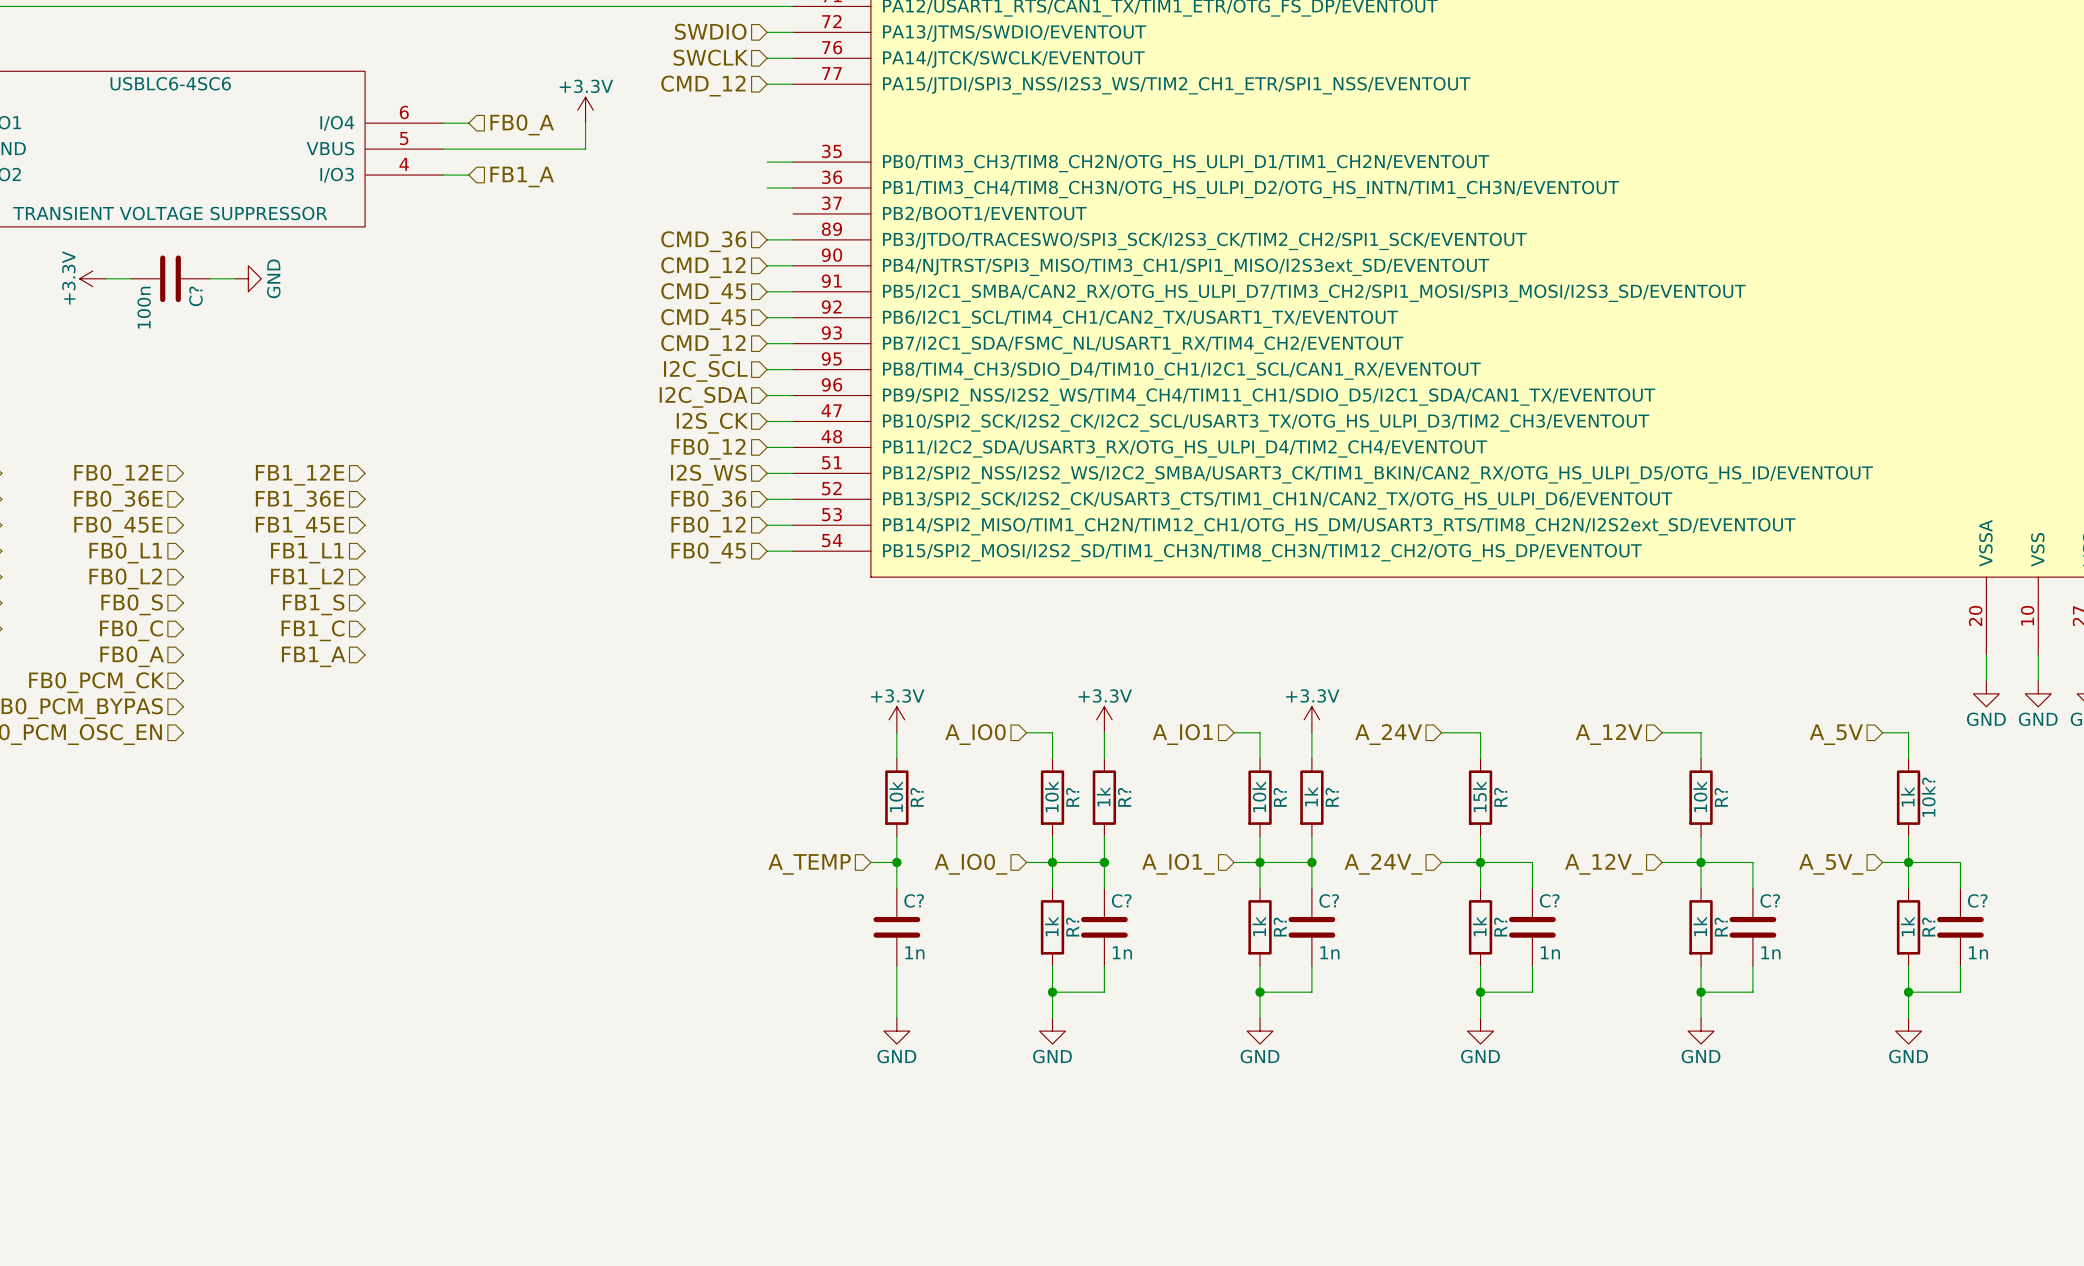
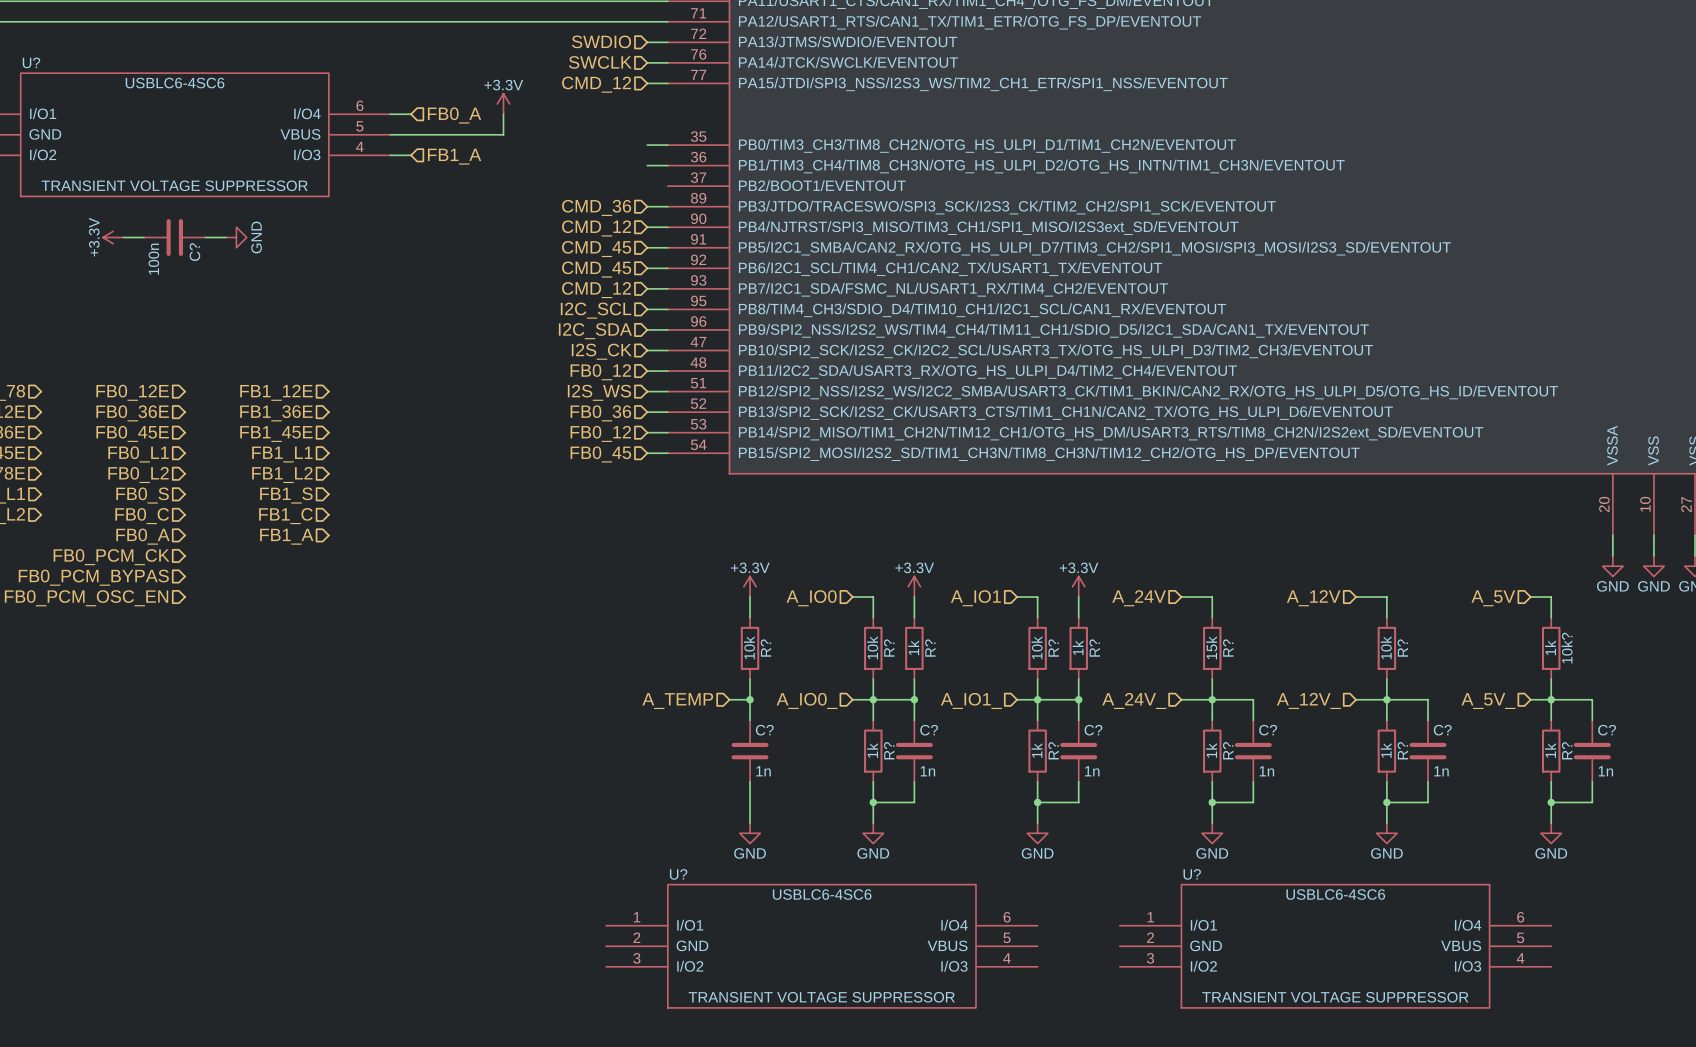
U?: none -> USBLC6-4SC6 (821, 946)
U?: none -> USBLC6-4SC6 (1335, 946)

